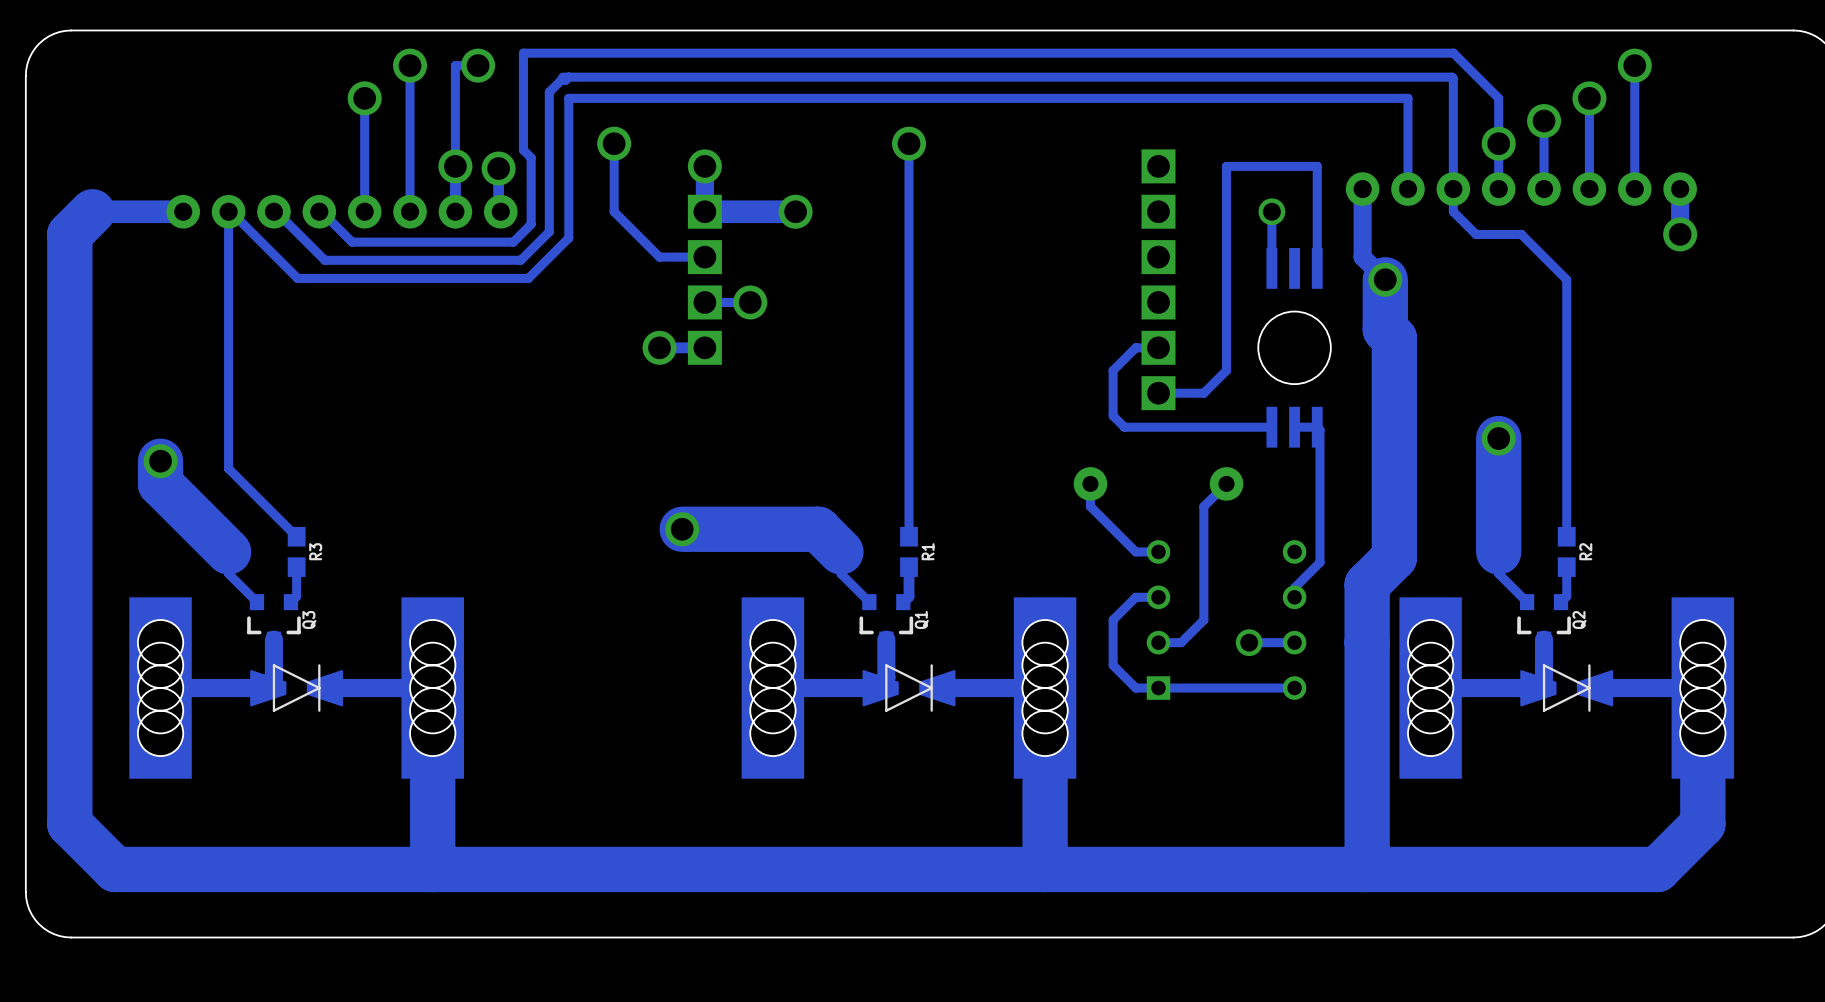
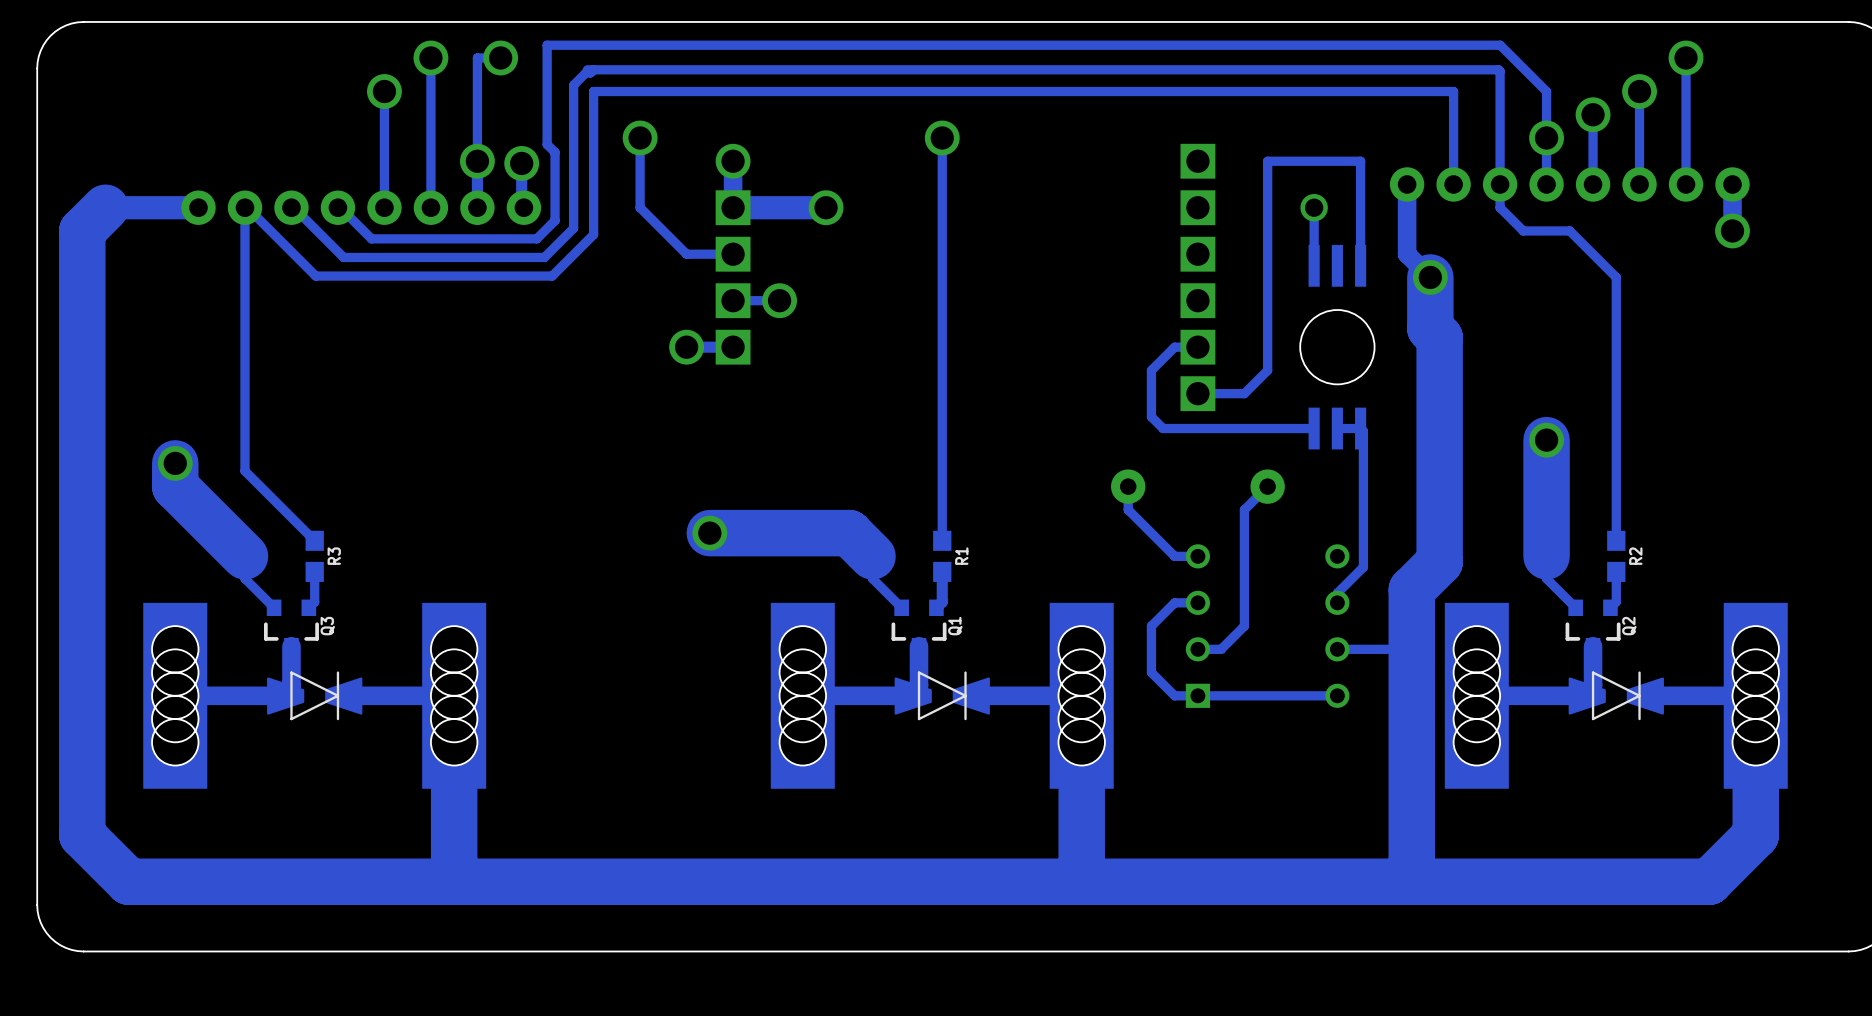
via: (1249, 642) -> none
track: (1294, 642) (1249, 642) -> (1337, 649) (1411, 649)

